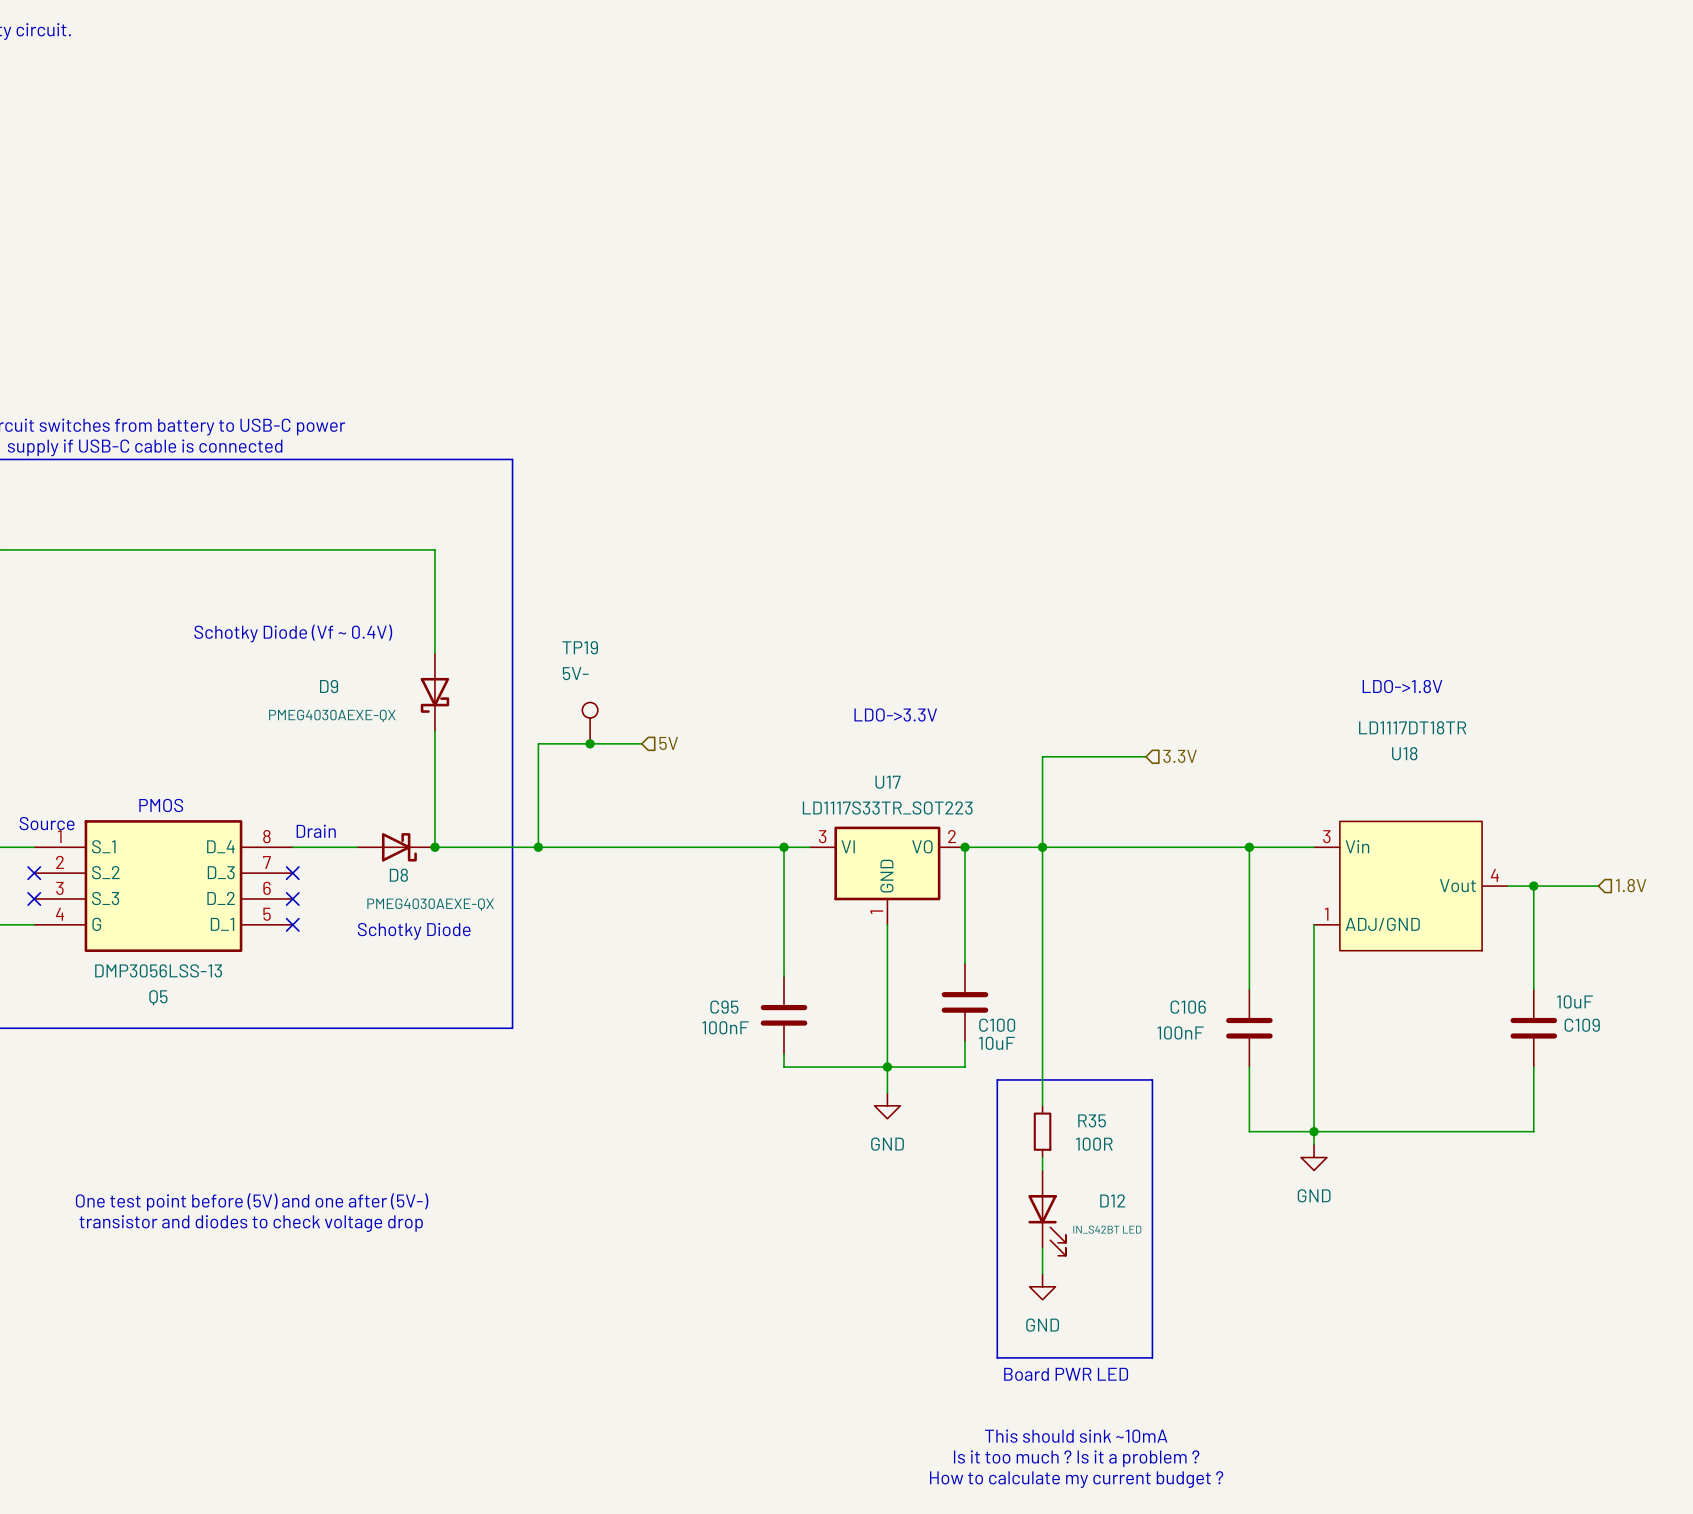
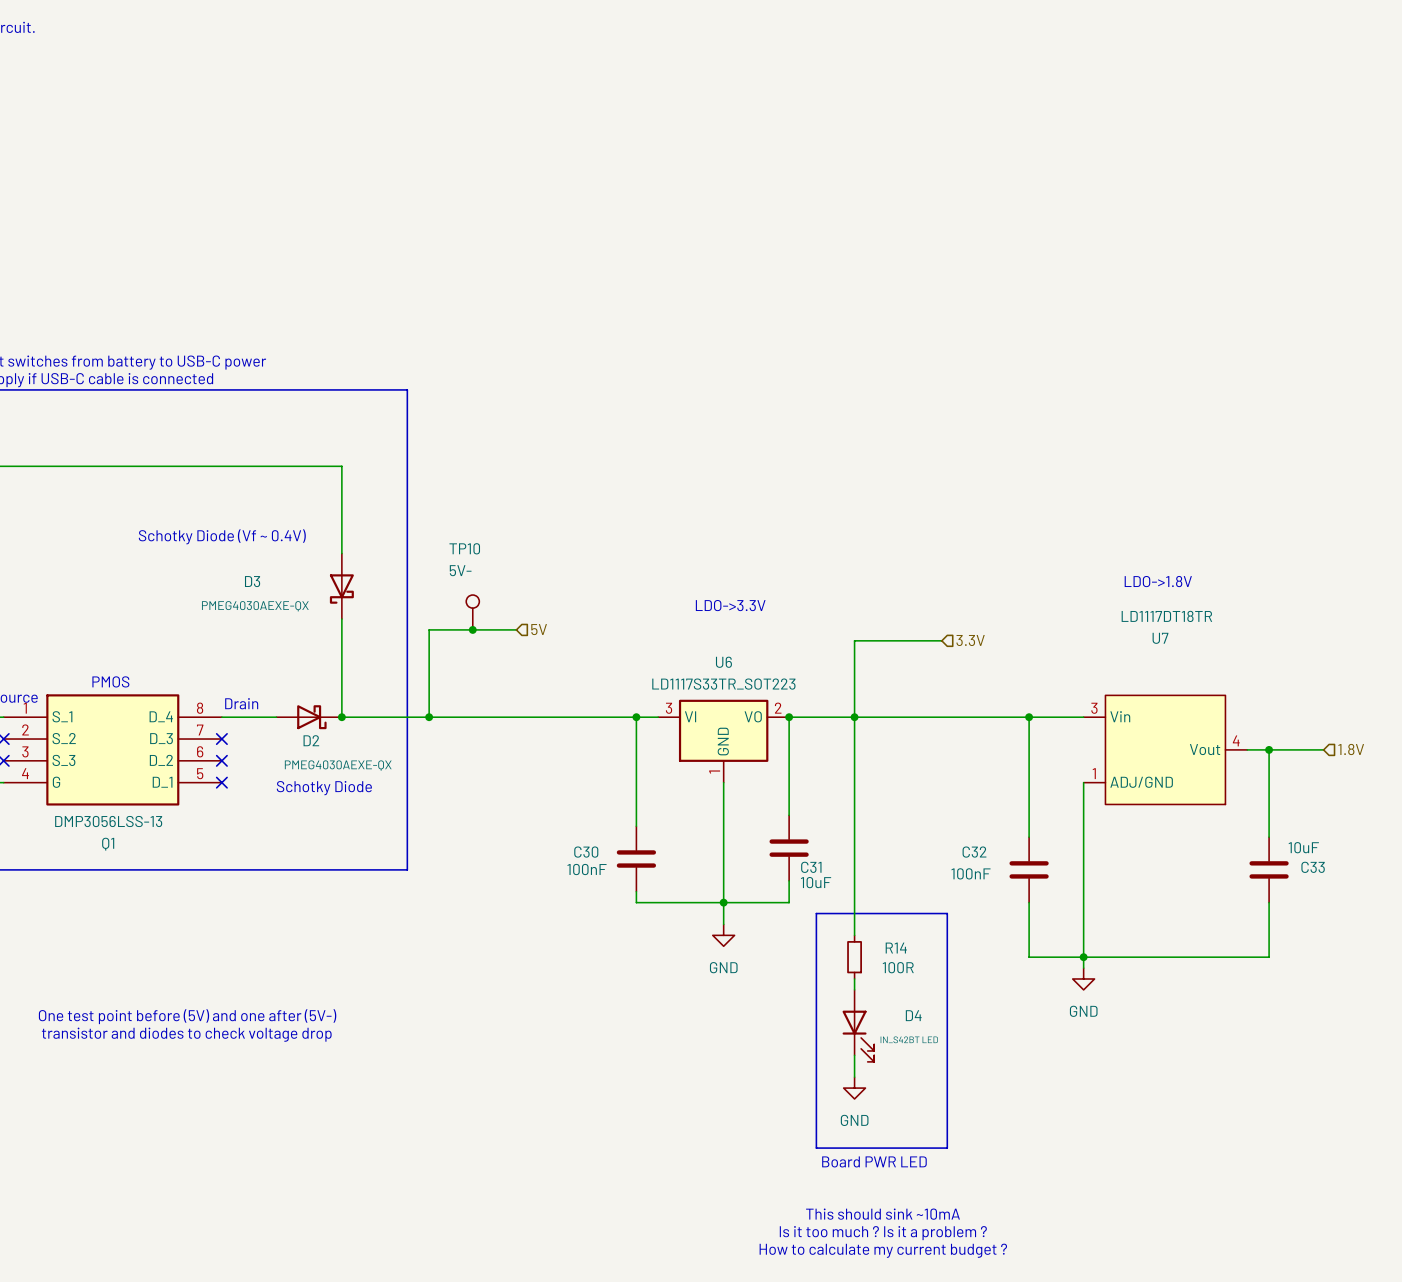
TP19 name: TP19 (580, 647) -> TP10 (464, 548)
D9 name: D9 (329, 686) -> D3 (252, 581)
U18 name: U18 (1404, 753) -> U7 (1160, 638)
U17 name: U17 (888, 782) -> U6 (723, 662)
D8 name: D8 (398, 875) -> D2 (311, 740)
Q5 name: Q5 (158, 997) -> Q1 (108, 844)
C95 name: C95 (724, 1007) -> C30 (586, 852)
C106 name: C106 (1188, 1007) -> C32 (974, 852)
C100 name: C100 (997, 1025) -> C31 (811, 867)
C109 name: C109 (1582, 1025) -> C33 (1313, 867)
R35 name: R35 (1092, 1120) -> R14 (896, 948)
D12 name: D12 (1112, 1200) -> D4 (913, 1015)

